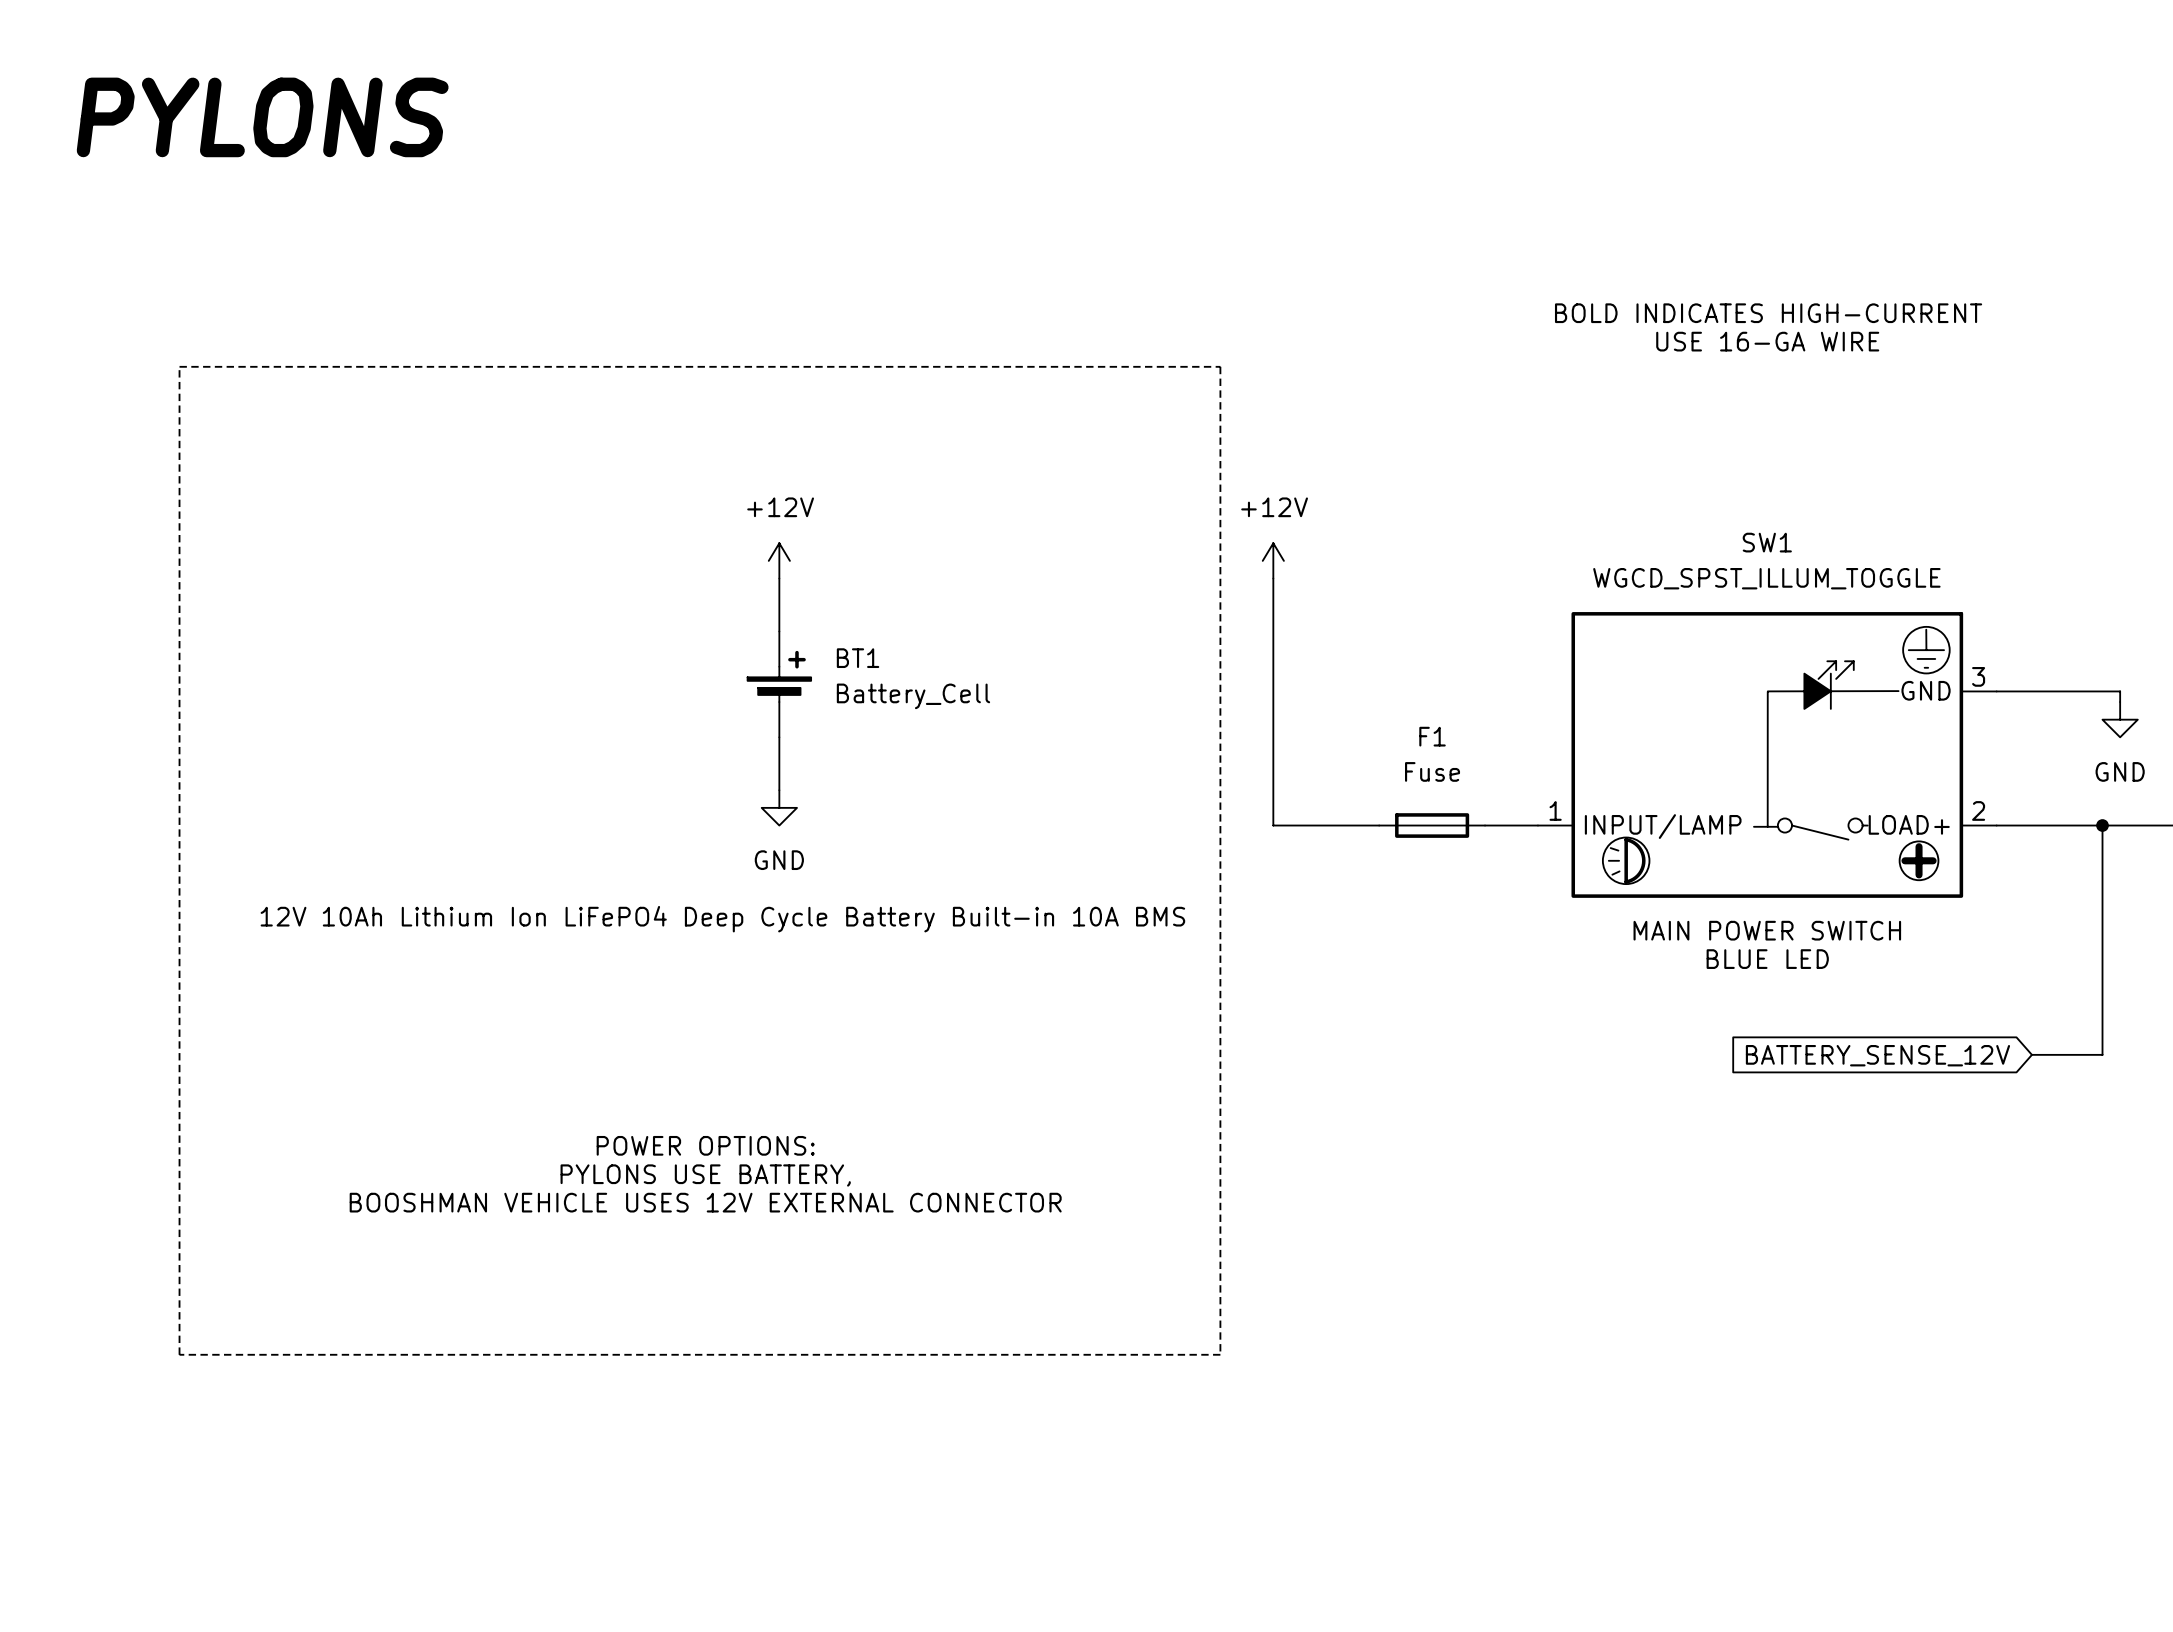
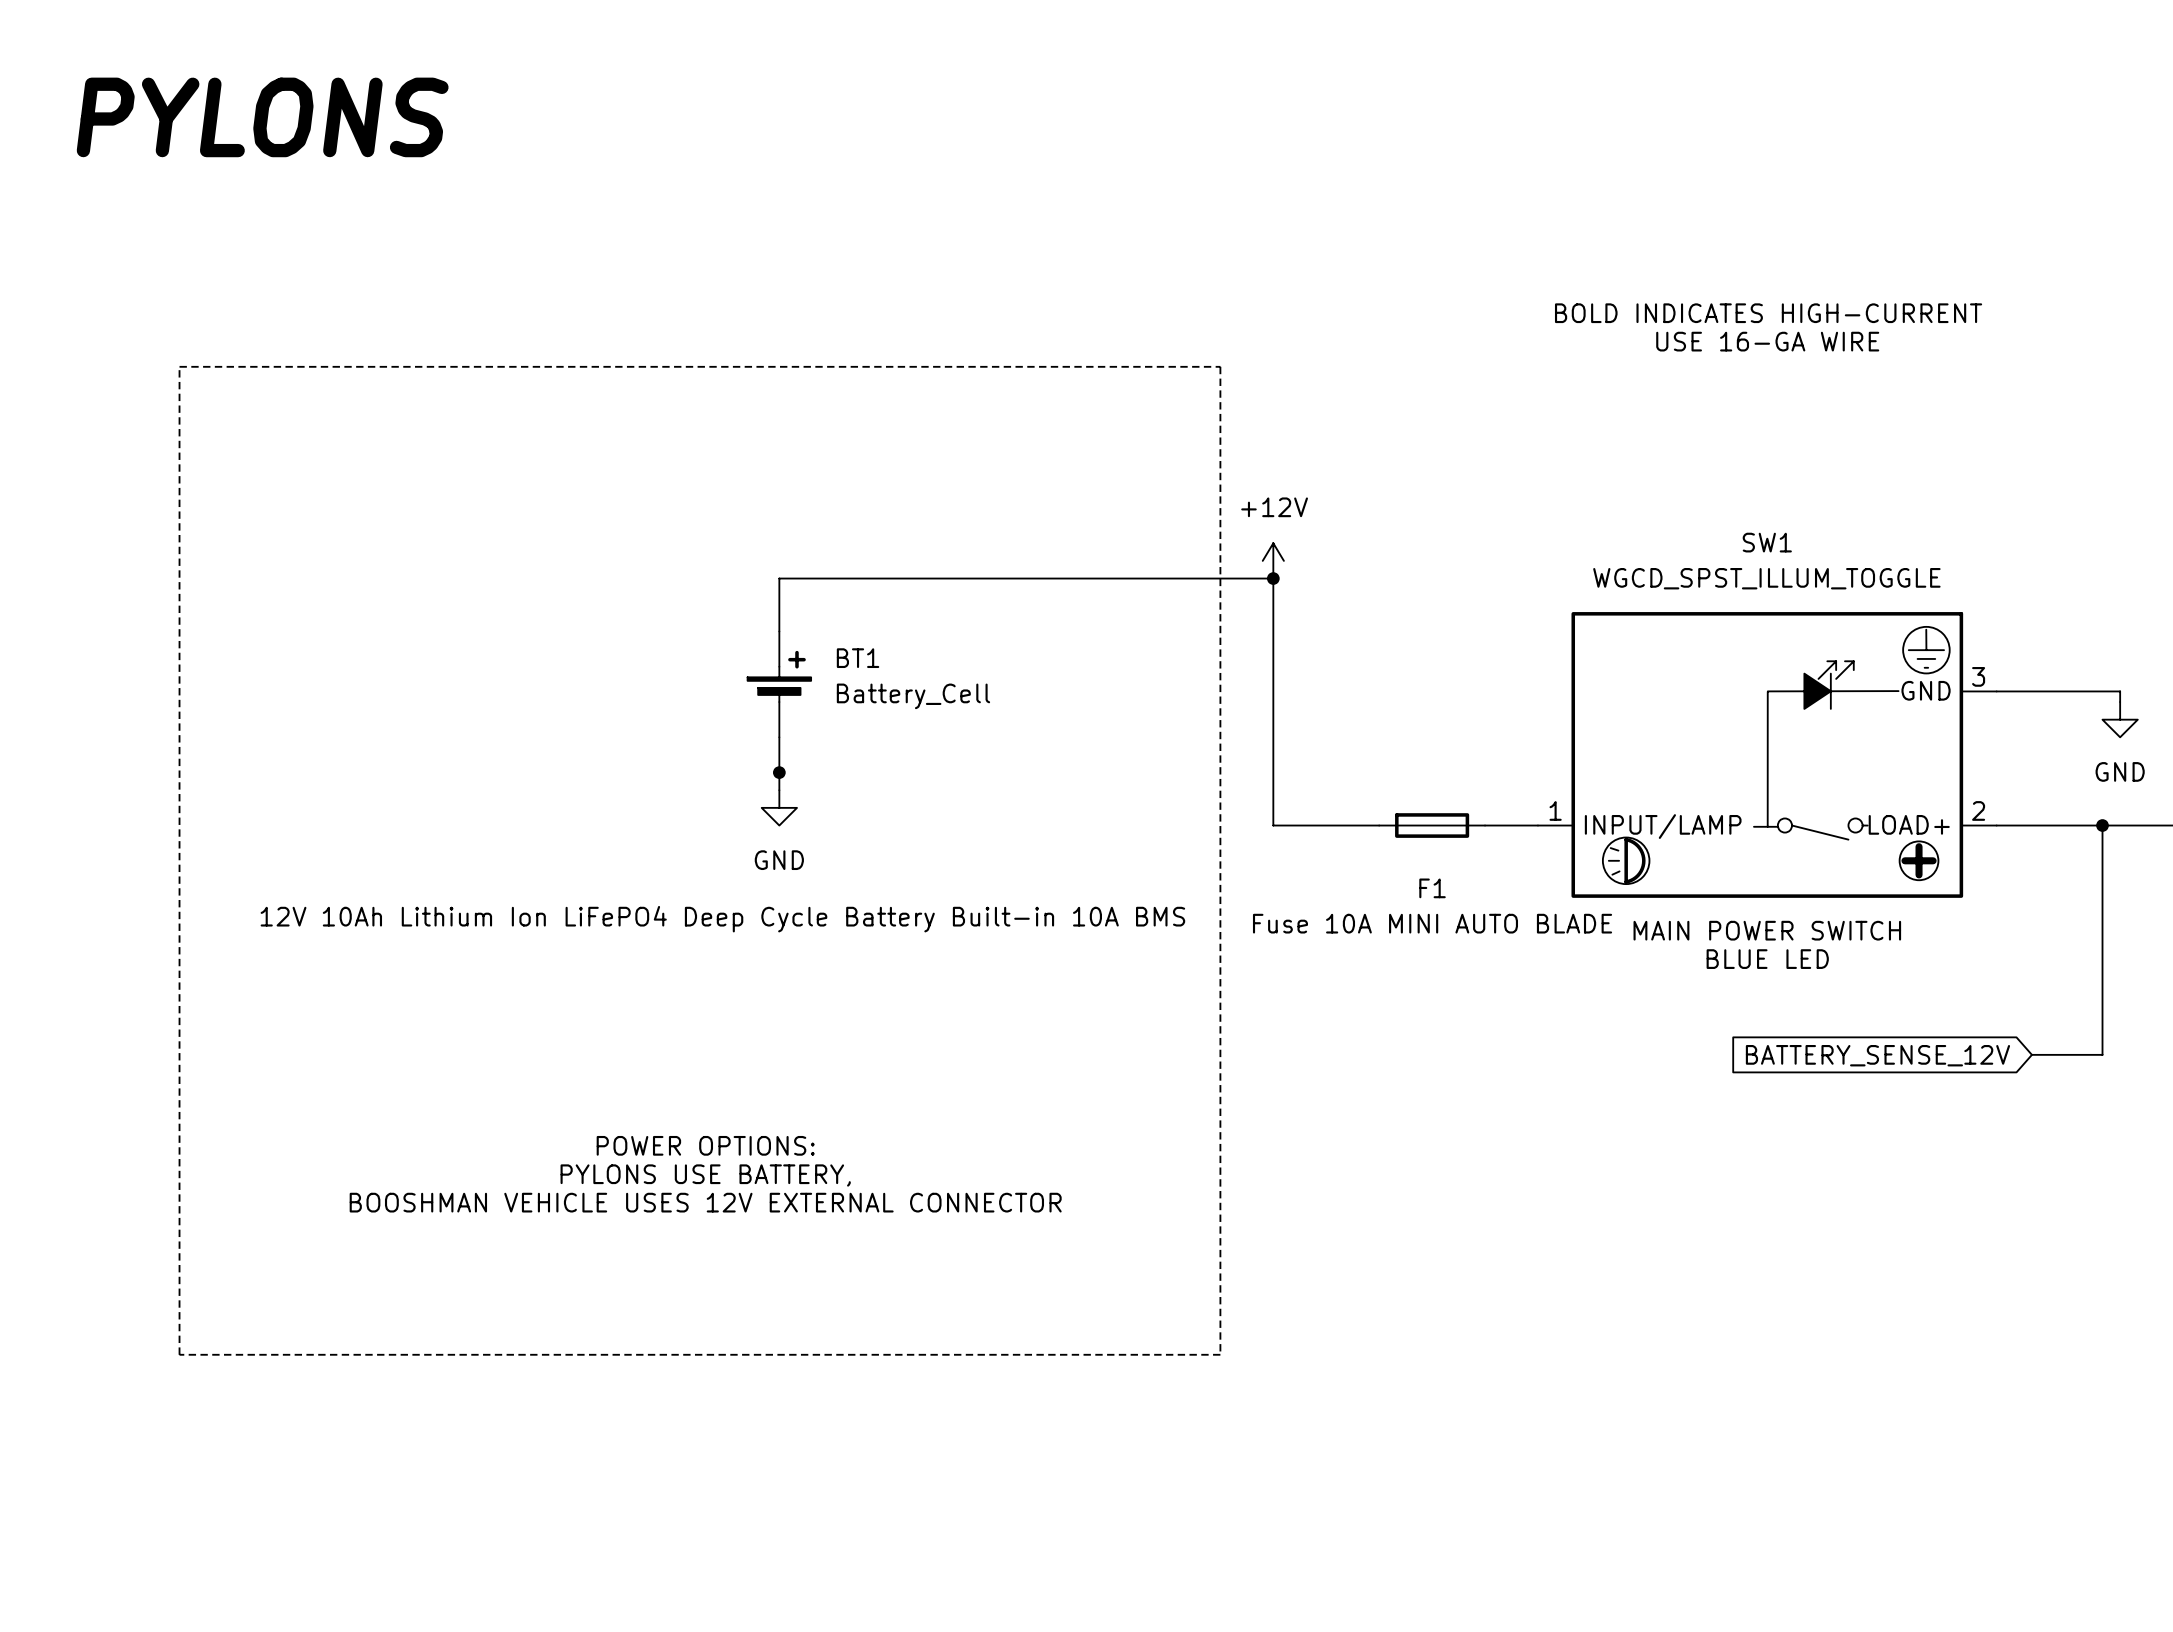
power symbol: +12V (779, 560) -> none
wire: none -> (779, 578) (1273, 578)
junction: none -> (1273, 578)
F1 name position: F1 (1432, 736) -> F1 (1432, 888)
F1 value: Fuse (1432, 771) -> Fuse 10A MINI AUTO BLADE (1432, 923)
junction: none -> (779, 772)

